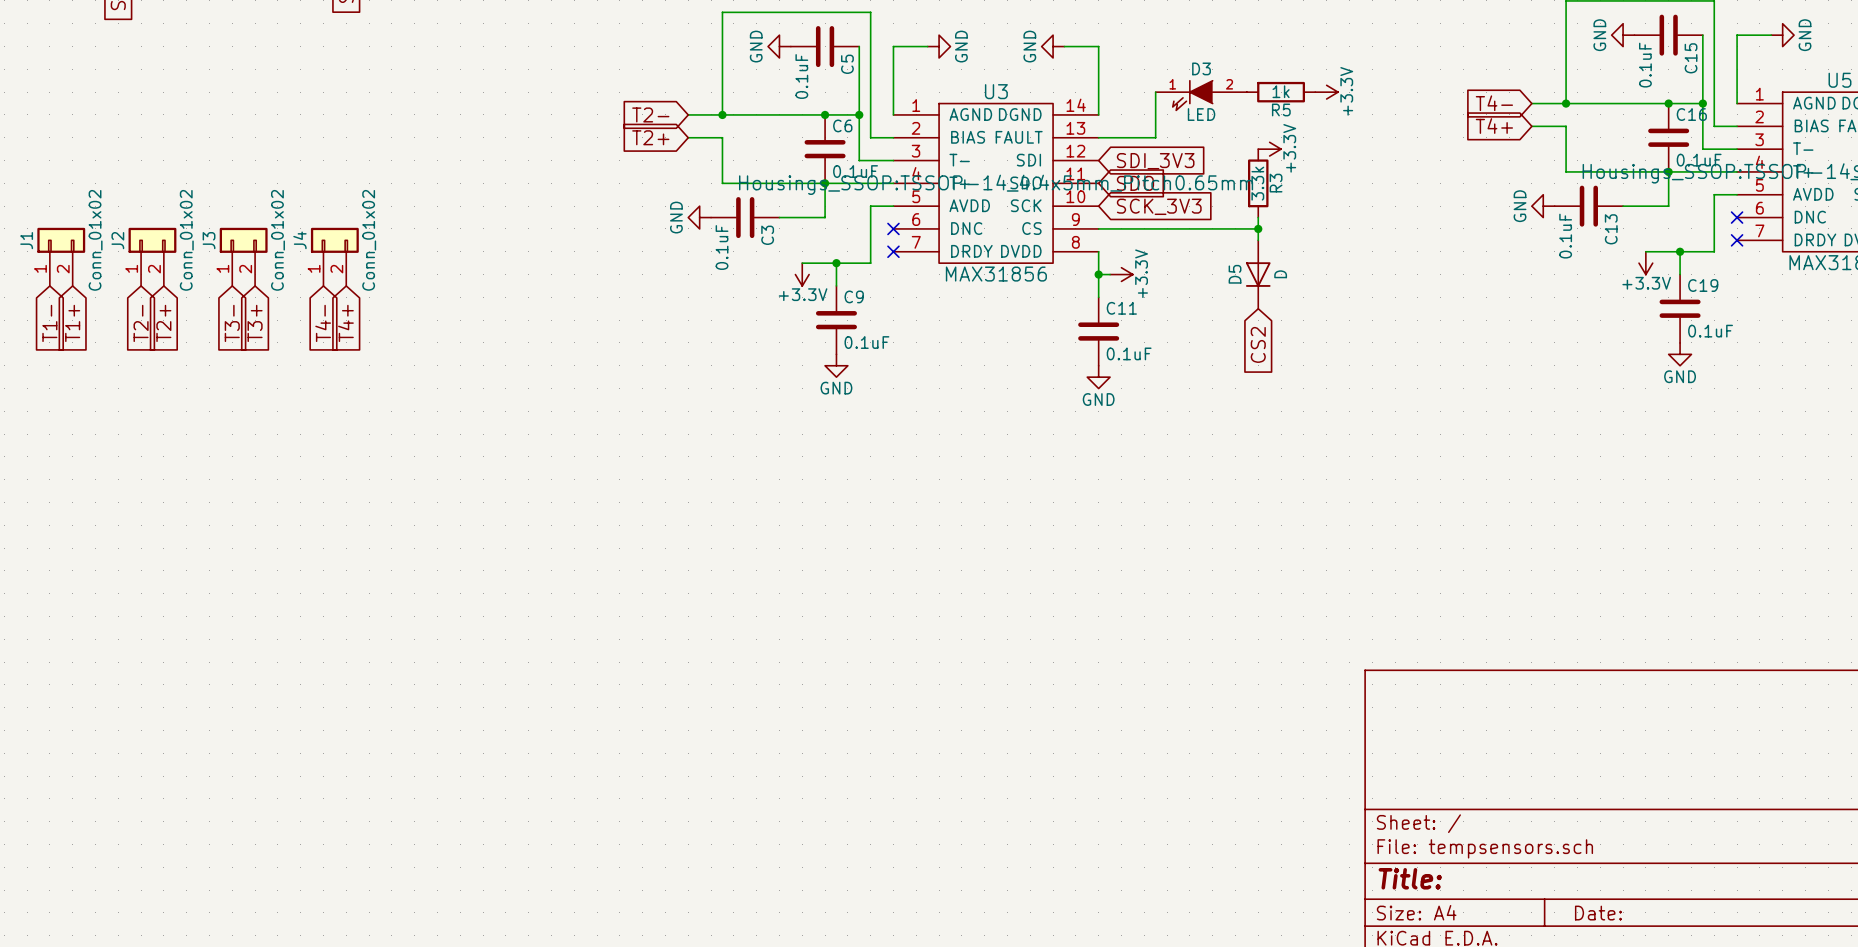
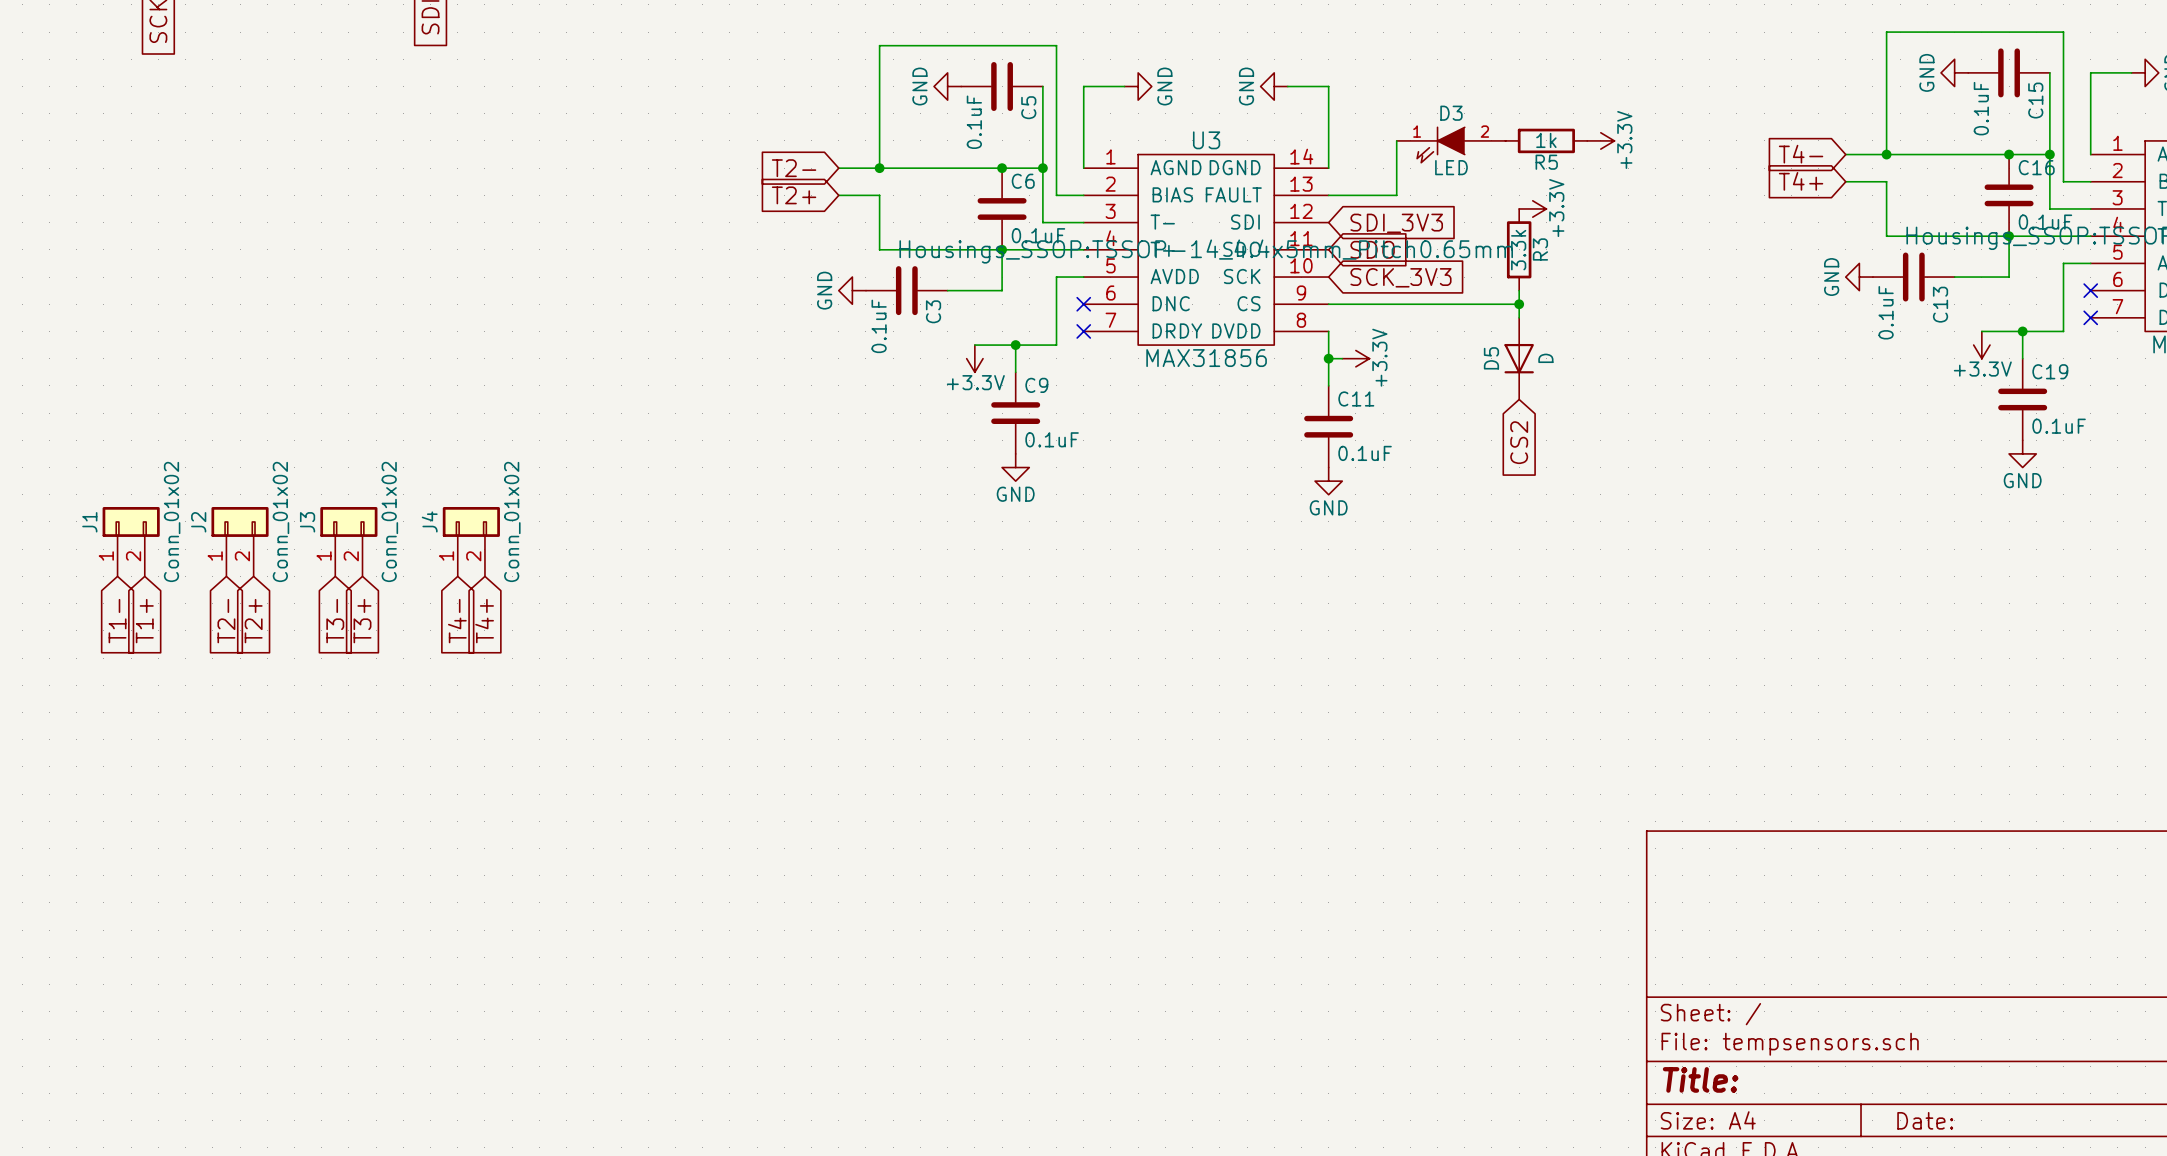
J1 position: (61, 256) -> (131, 541)
J2 position: (152, 256) -> (240, 541)
J3 position: (243, 256) -> (348, 541)
J4 position: (334, 256) -> (471, 541)
global label position: T1- (49, 323) -> T1- (117, 621)
global label position: T1+ (72, 323) -> T1+ (144, 621)
global label position: T2- (141, 323) -> T2- (226, 621)
global label position: T2+ (163, 323) -> T2+ (253, 621)
global label position: T3- (232, 323) -> T3- (335, 621)
global label position: T3+ (255, 323) -> T3+ (362, 621)
global label position: T4- (323, 323) -> T4- (457, 621)
global label position: T4+ (345, 323) -> T4+ (484, 621)

